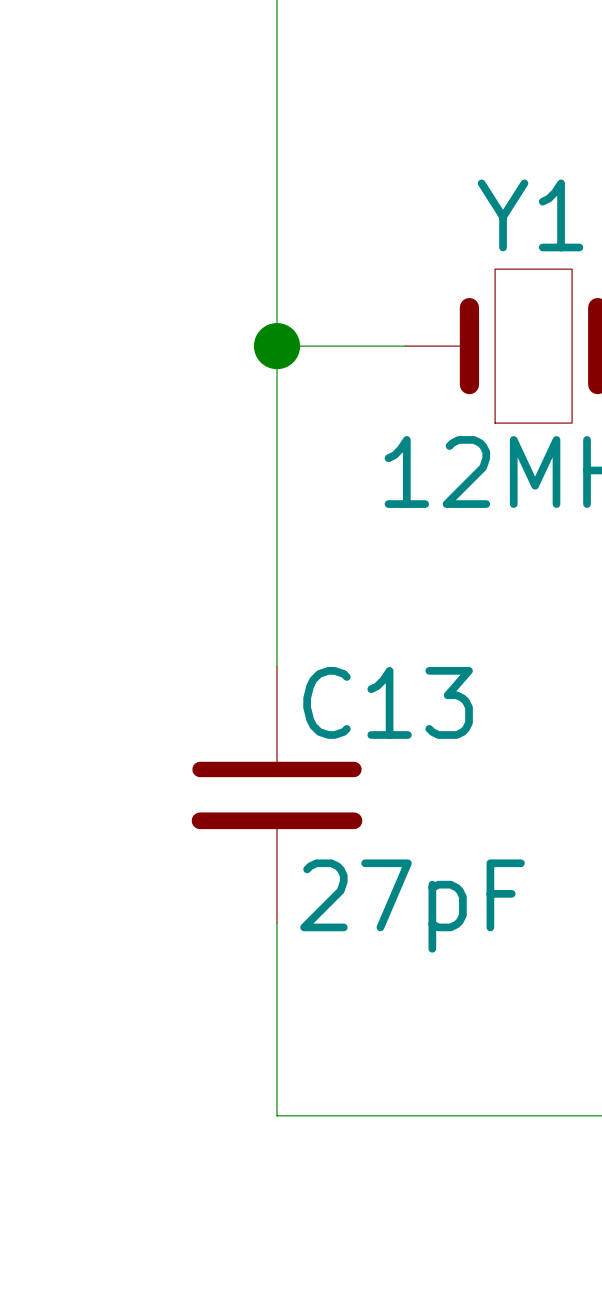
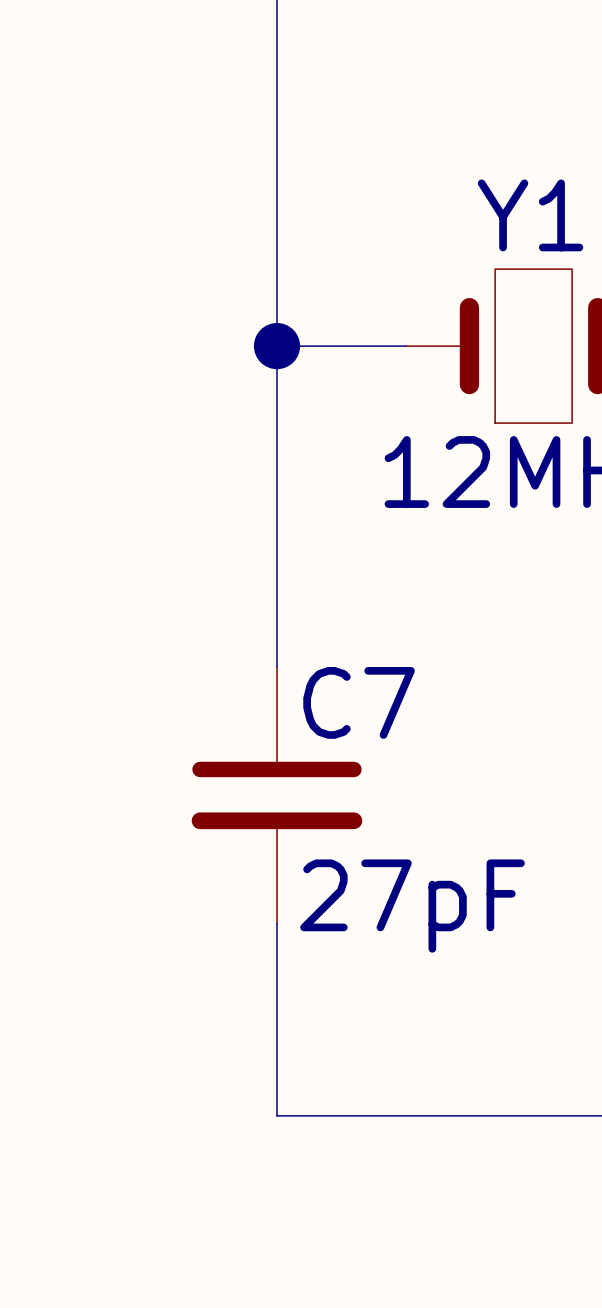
C13 name: C13 (388, 702) -> C7 (359, 702)

